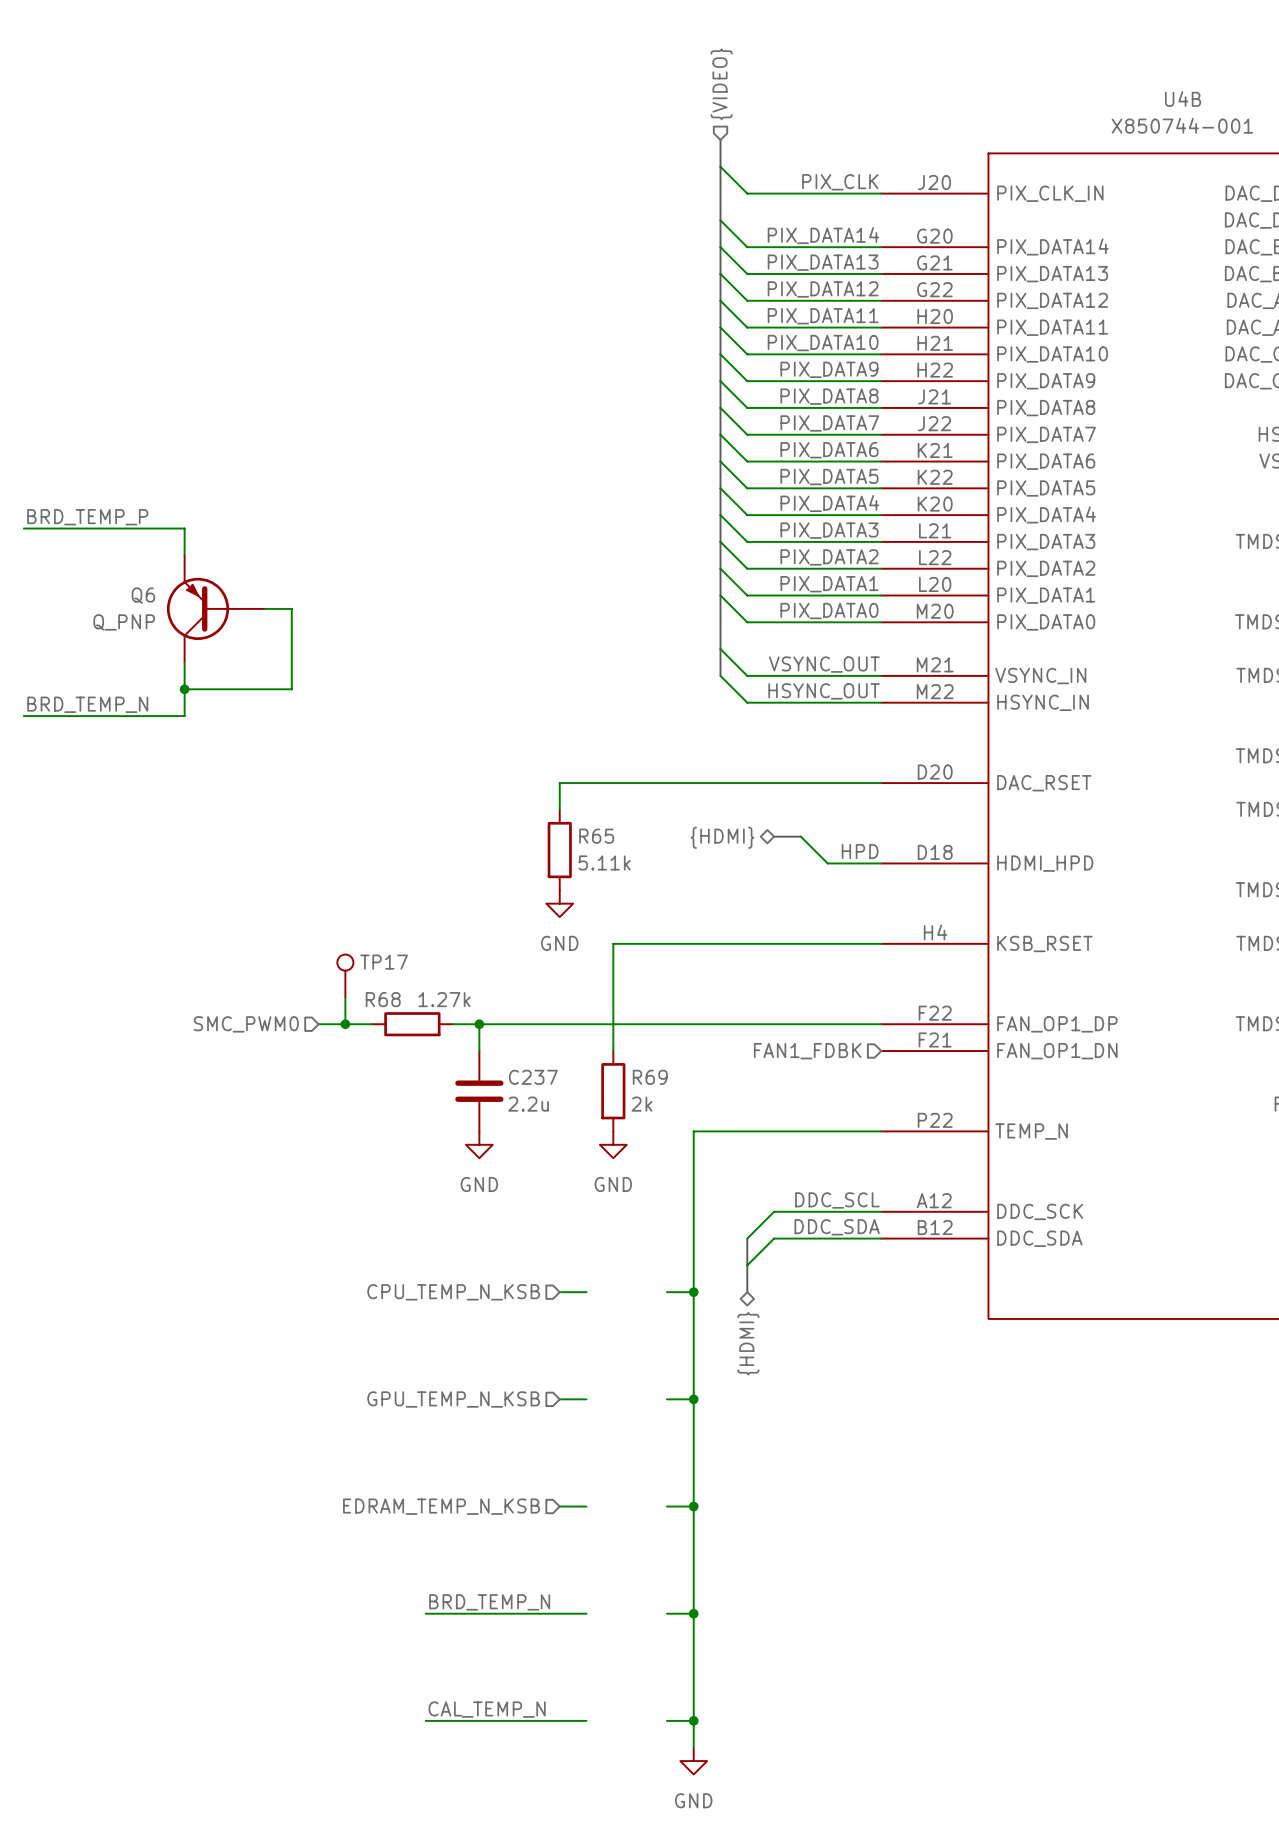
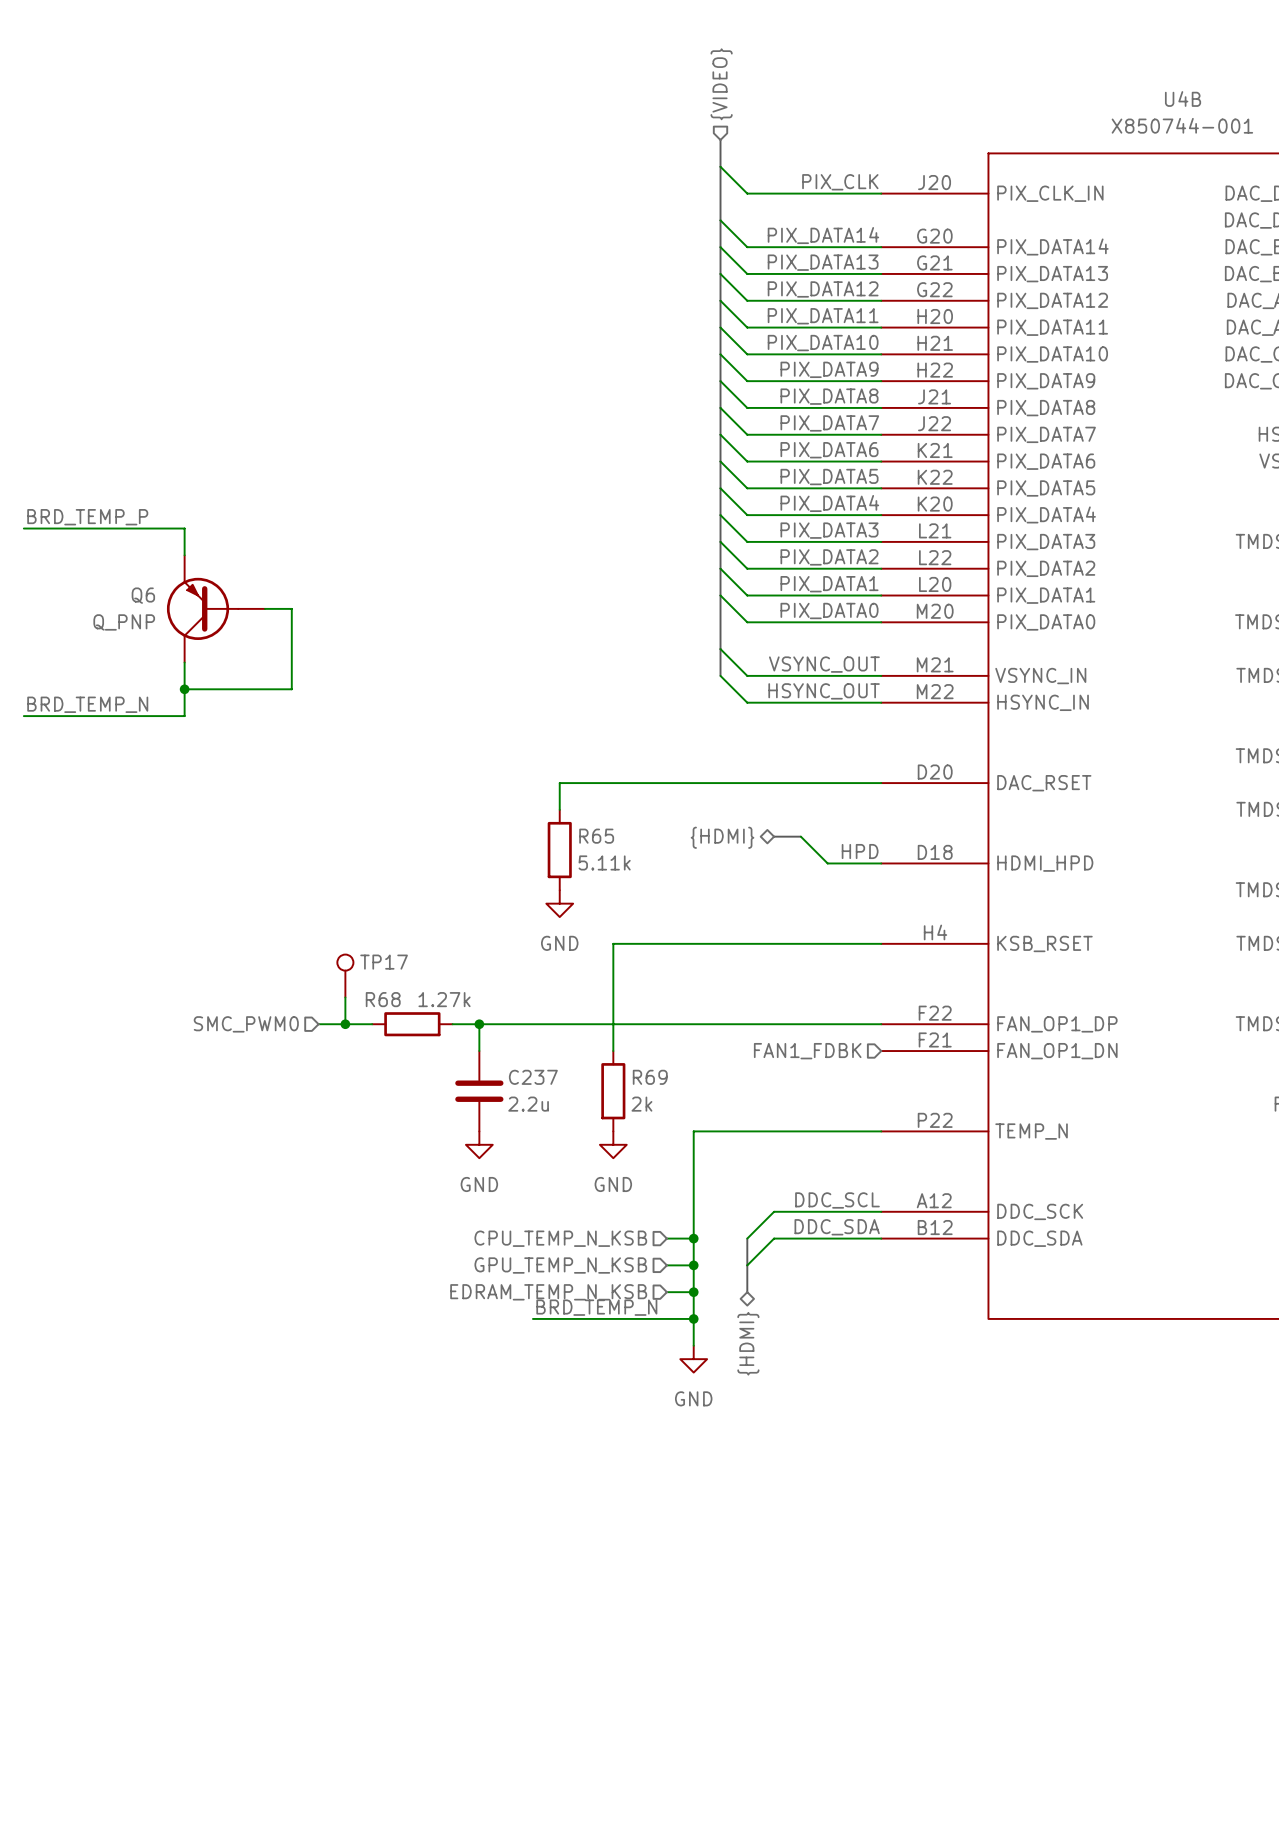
junction: none -> (693, 1238)
junction: none -> (693, 1265)
hierarchical label position: CPU_TEMP_N_KSB (453, 1292) -> CPU_TEMP_N_KSB (560, 1238)
wire: (559, 1292) (586, 1292) -> (666, 1265) (693, 1265)
label: none -> BRD_TEMP_N (596, 1307)
wire: none -> (532, 1318) (693, 1318)
junction: none -> (693, 1318)
wire: (693, 1345) (693, 1747) -> none
power symbol: none -> GND (693, 1359)
hierarchical label position: GPU_TEMP_N_KSB (453, 1399) -> GPU_TEMP_N_KSB (560, 1265)
wire: (559, 1399) (586, 1399) -> none
wire: (666, 1399) (693, 1399) -> (666, 1238) (693, 1238)
junction: (693, 1399) -> none
hierarchical label position: EDRAM_TEMP_N_KSB (441, 1506) -> EDRAM_TEMP_N_KSB (548, 1292)
wire: (559, 1506) (586, 1506) -> none
wire: (666, 1506) (693, 1506) -> none
junction: (693, 1506) -> none
label: BRD_TEMP_N (489, 1602) -> none
wire: (425, 1613) (586, 1613) -> none
wire: (666, 1613) (693, 1613) -> none
junction: (693, 1613) -> none
label: CAL_TEMP_N (487, 1709) -> none
wire: (425, 1720) (586, 1720) -> none
wire: (666, 1720) (693, 1720) -> none
junction: (693, 1720) -> none
power symbol: GND (693, 1761) -> none

